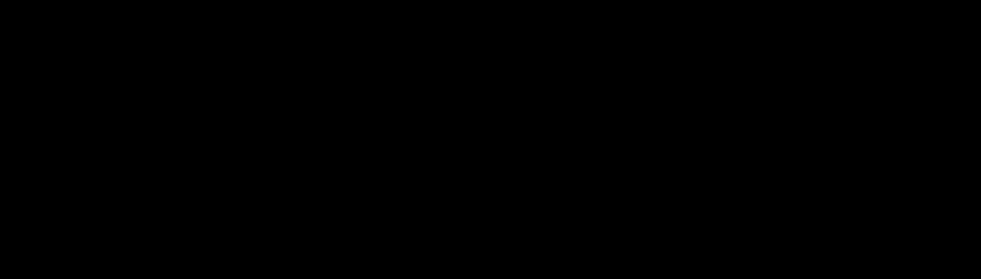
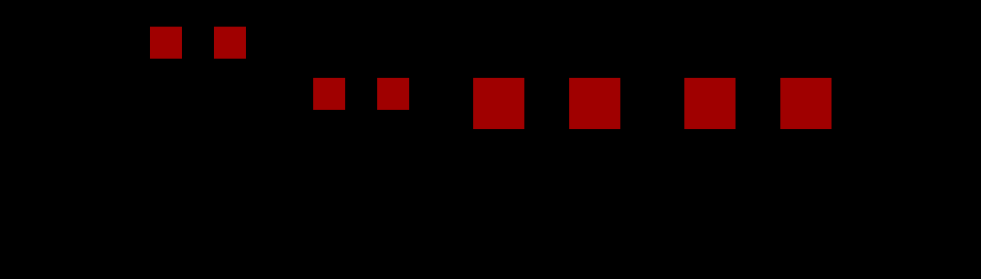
part: none -> (197, 42)
part: none -> (361, 93)
part: none -> (546, 103)
part: none -> (757, 103)

